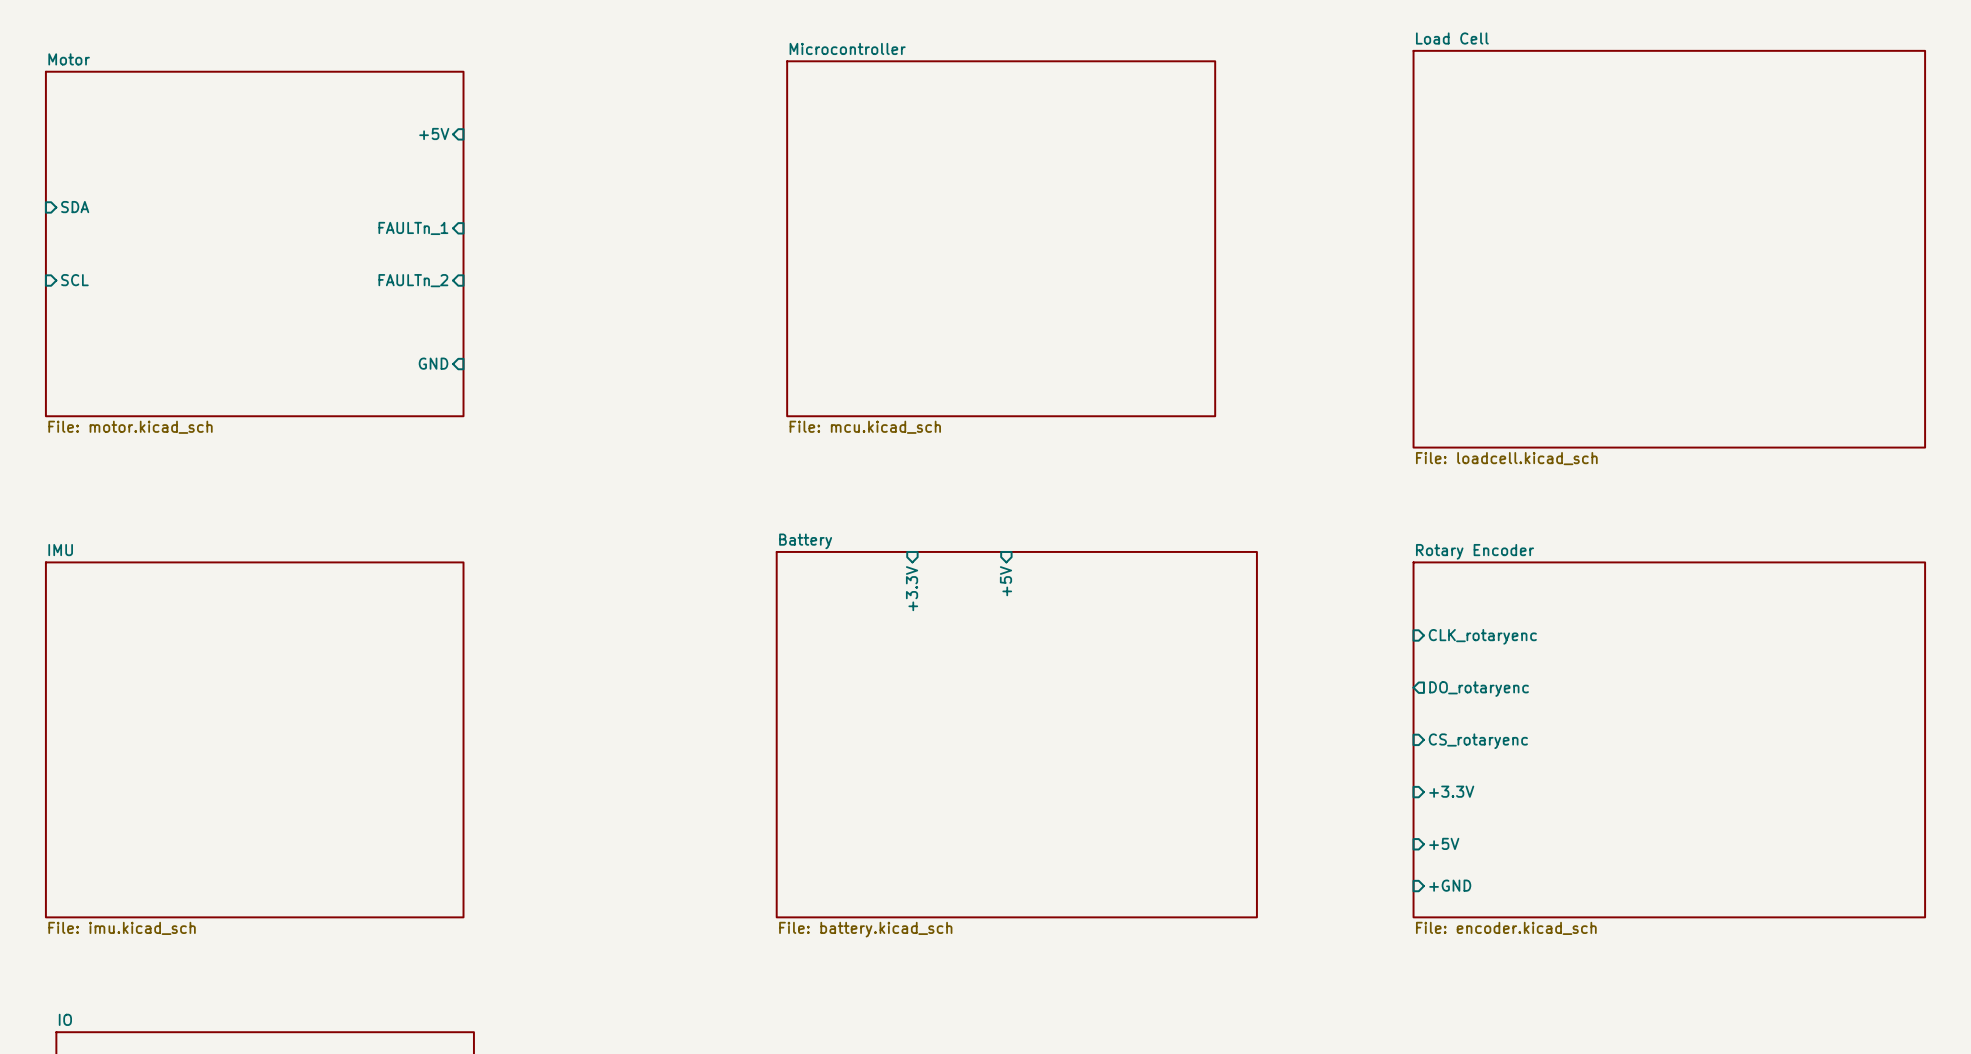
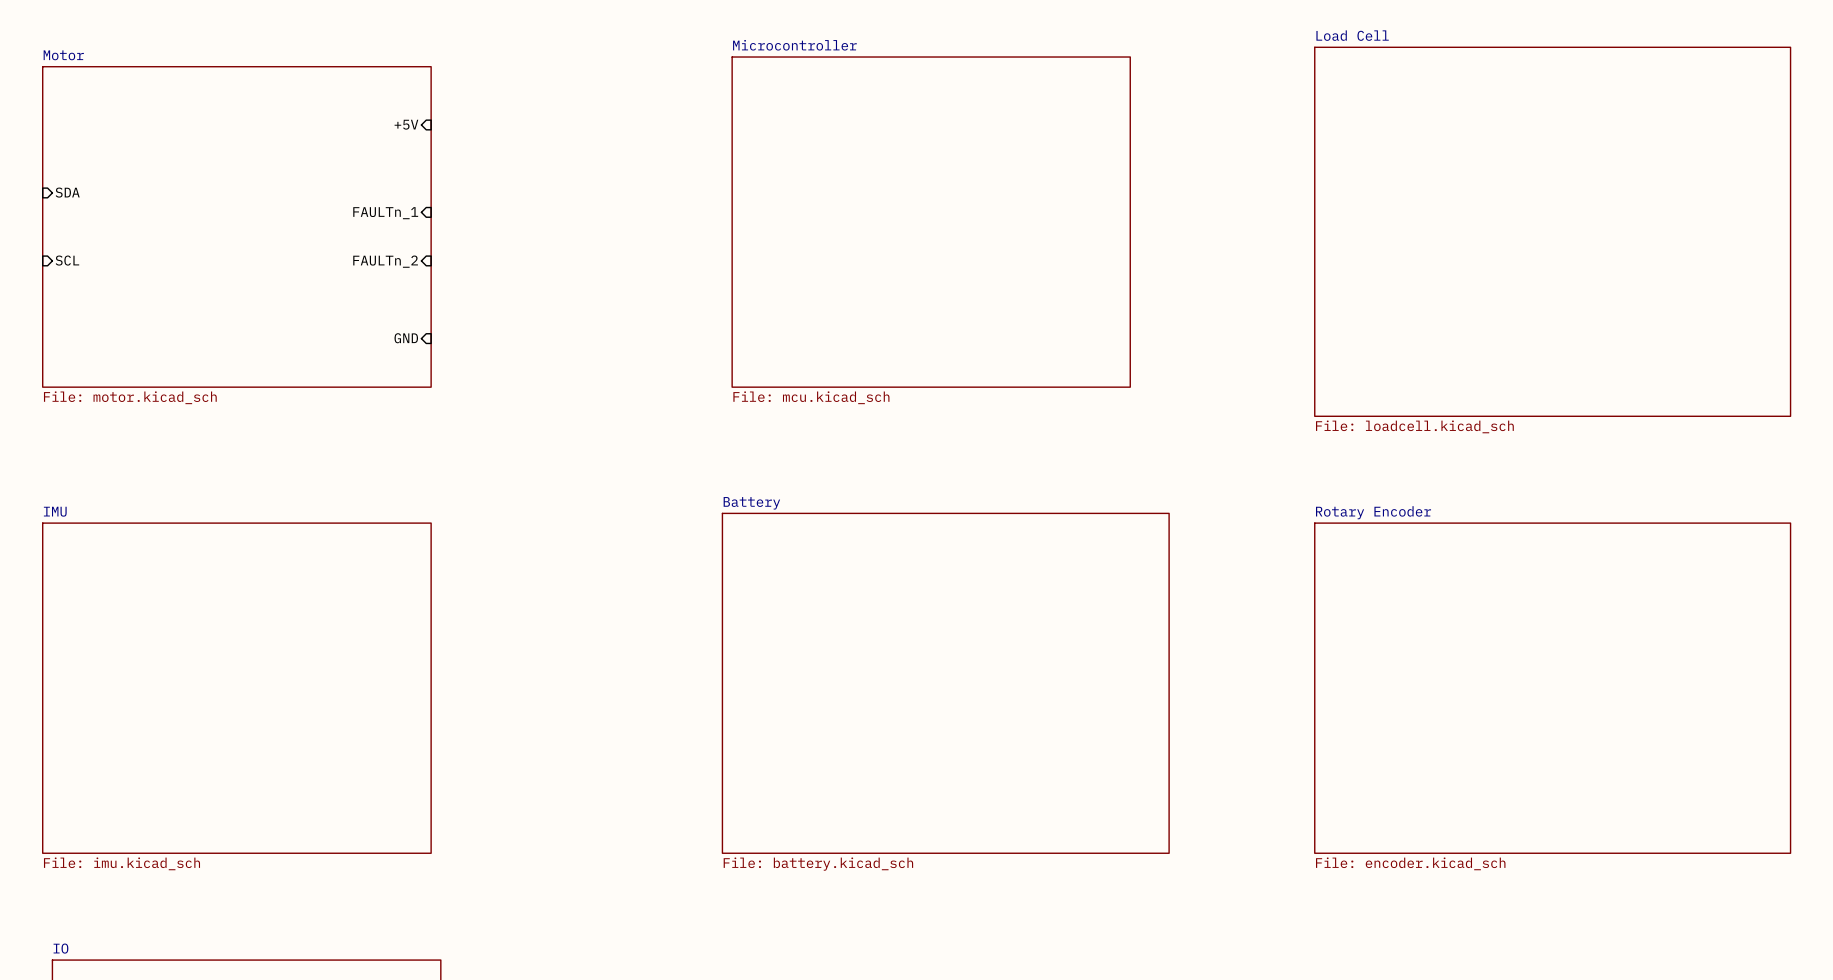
sheet pin: +5V (1005, 581) -> none
sheet pin: +3.3V (912, 588) -> none
sheet pin: CLK_rotaryenc (1482, 636) -> none
sheet pin: DO_rotaryenc (1479, 689) -> none
sheet pin: CS_rotaryenc (1478, 741) -> none
sheet pin: +3.3V (1451, 791) -> none
sheet pin: +5V (1444, 843) -> none
sheet pin: +GND (1450, 885) -> none

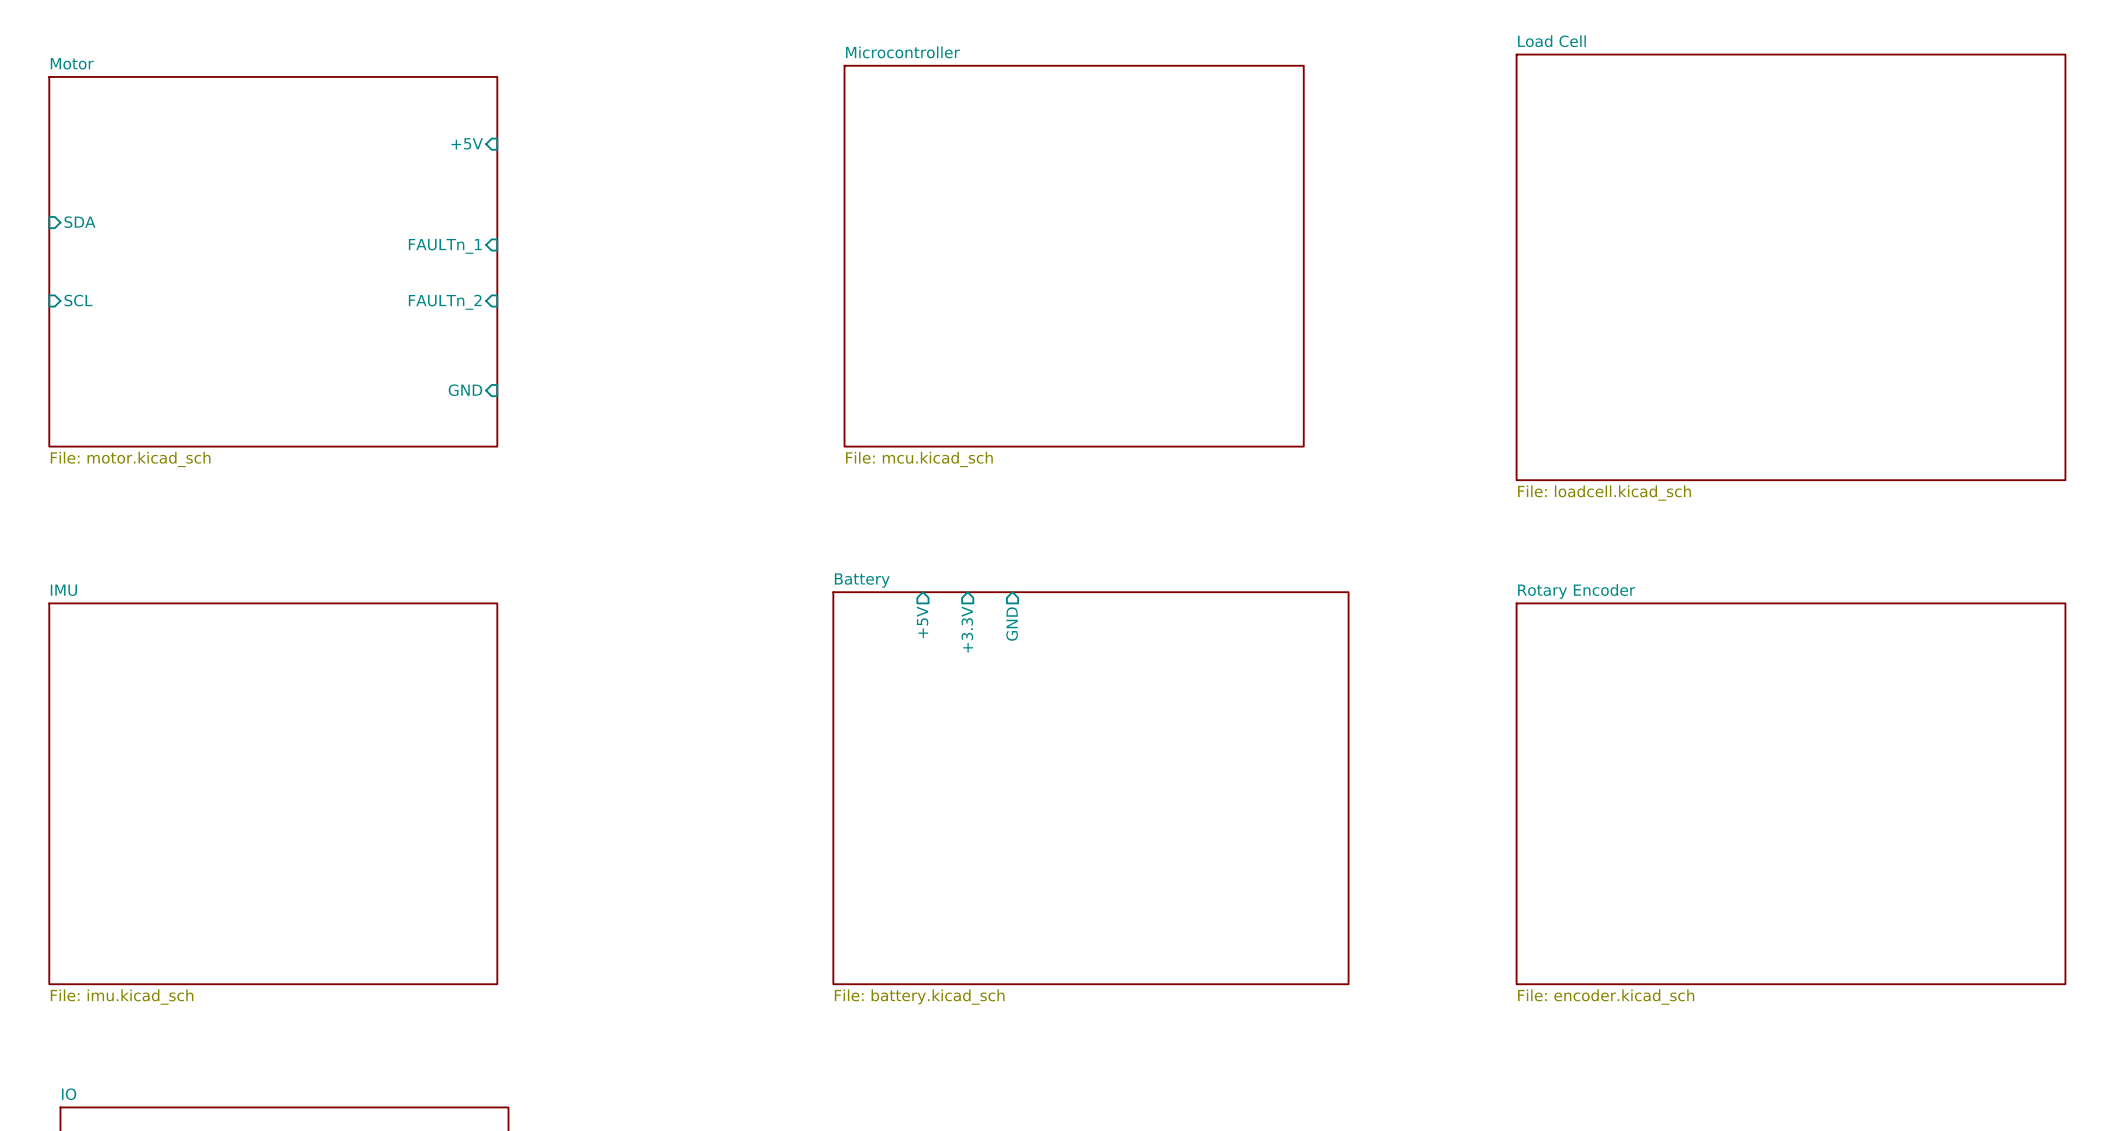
sheet pin: none -> +5V (922, 622)
sheet pin: none -> GND (1012, 624)
sheet pin: none -> +3.3V (967, 629)

